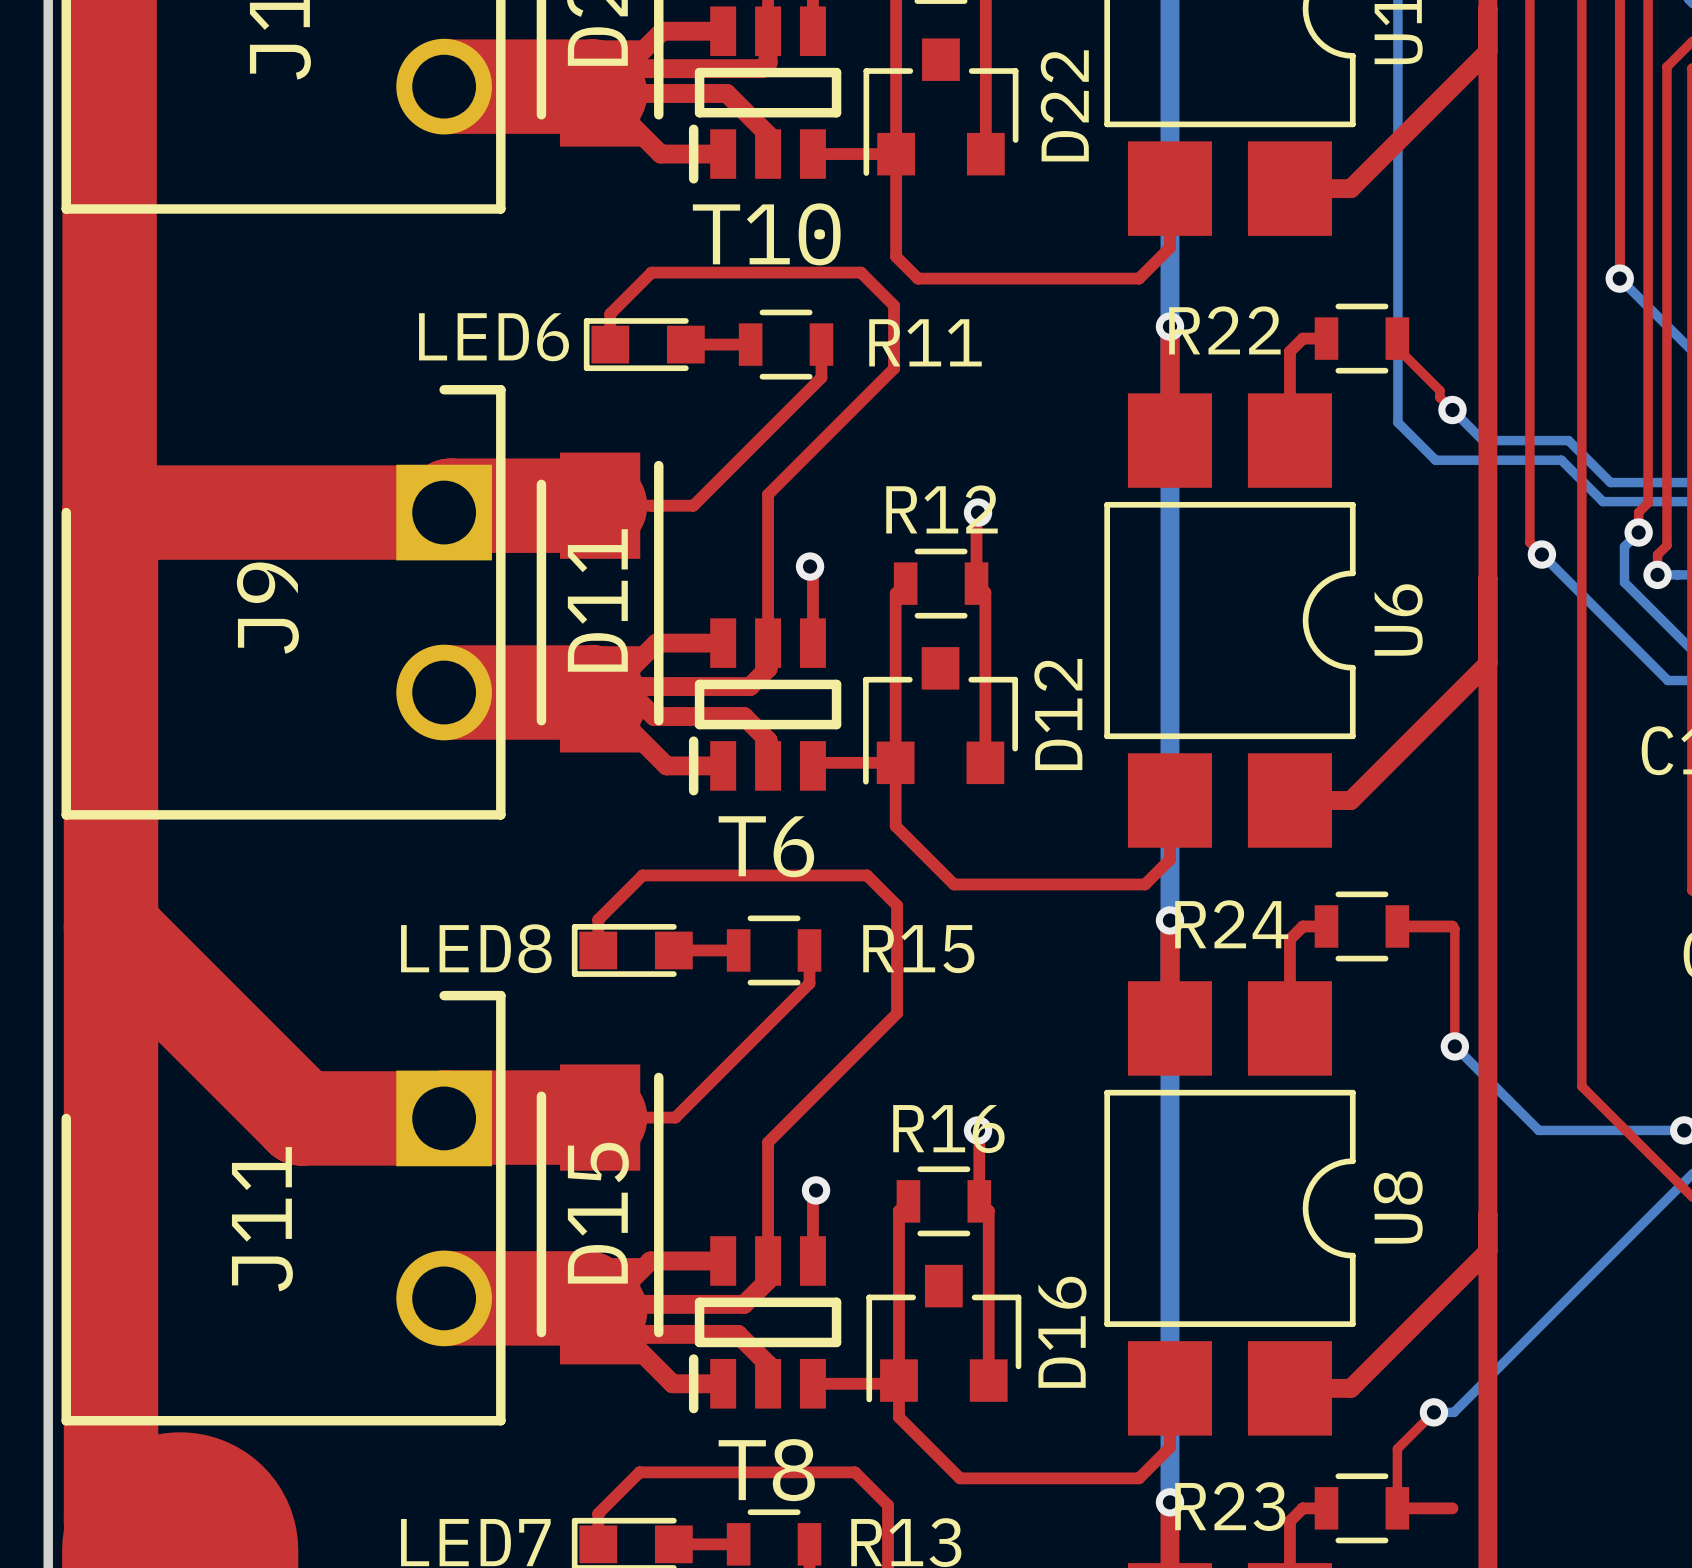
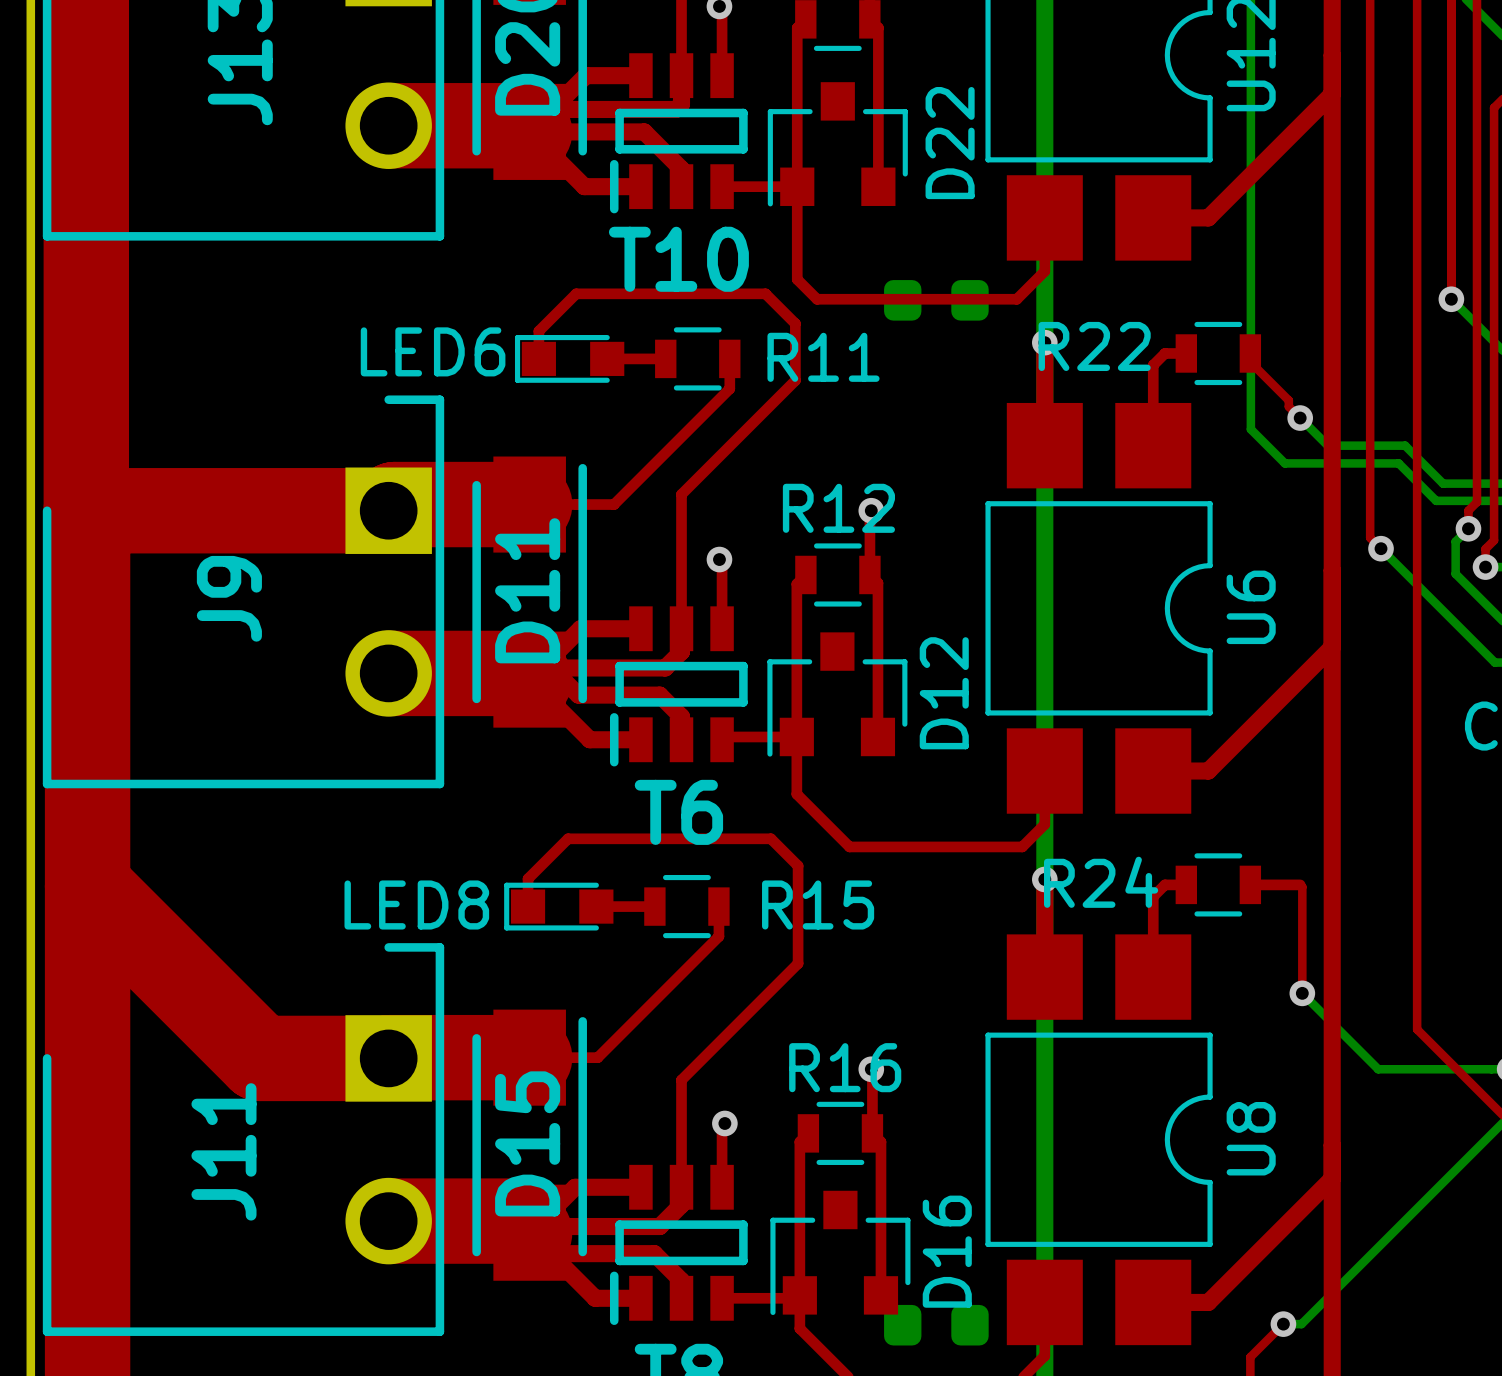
part: none -> (936, 300)
part: none -> (936, 1325)

